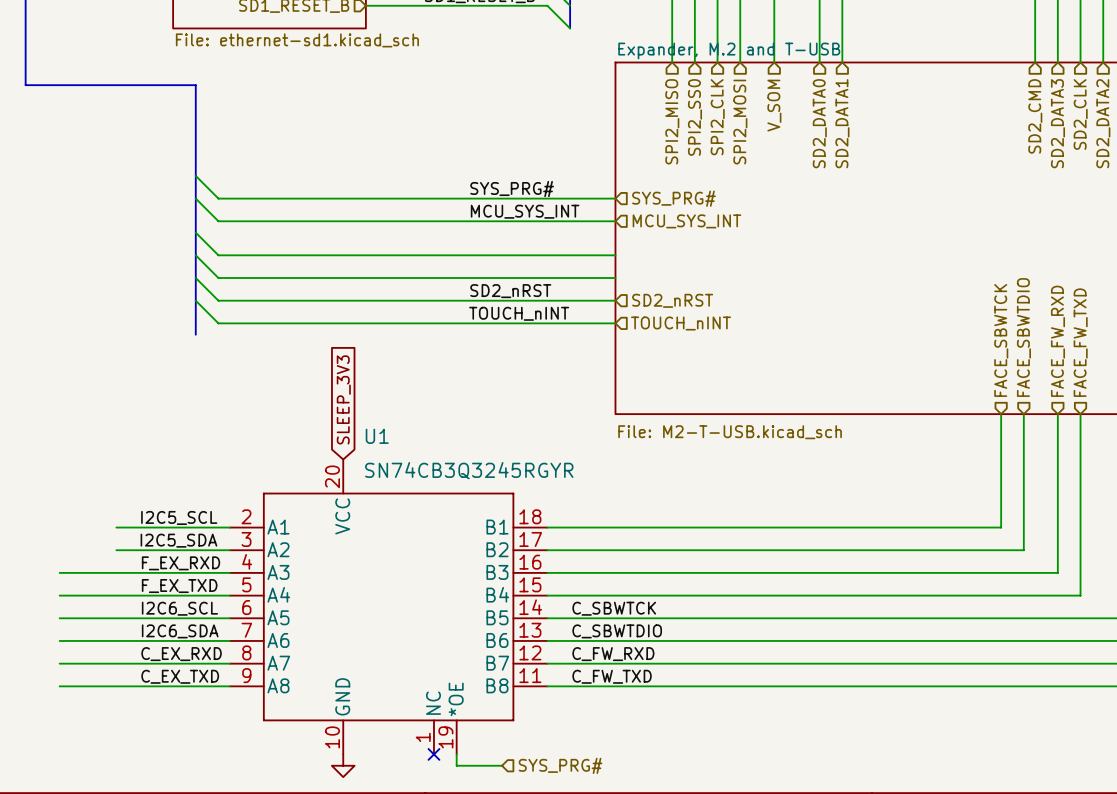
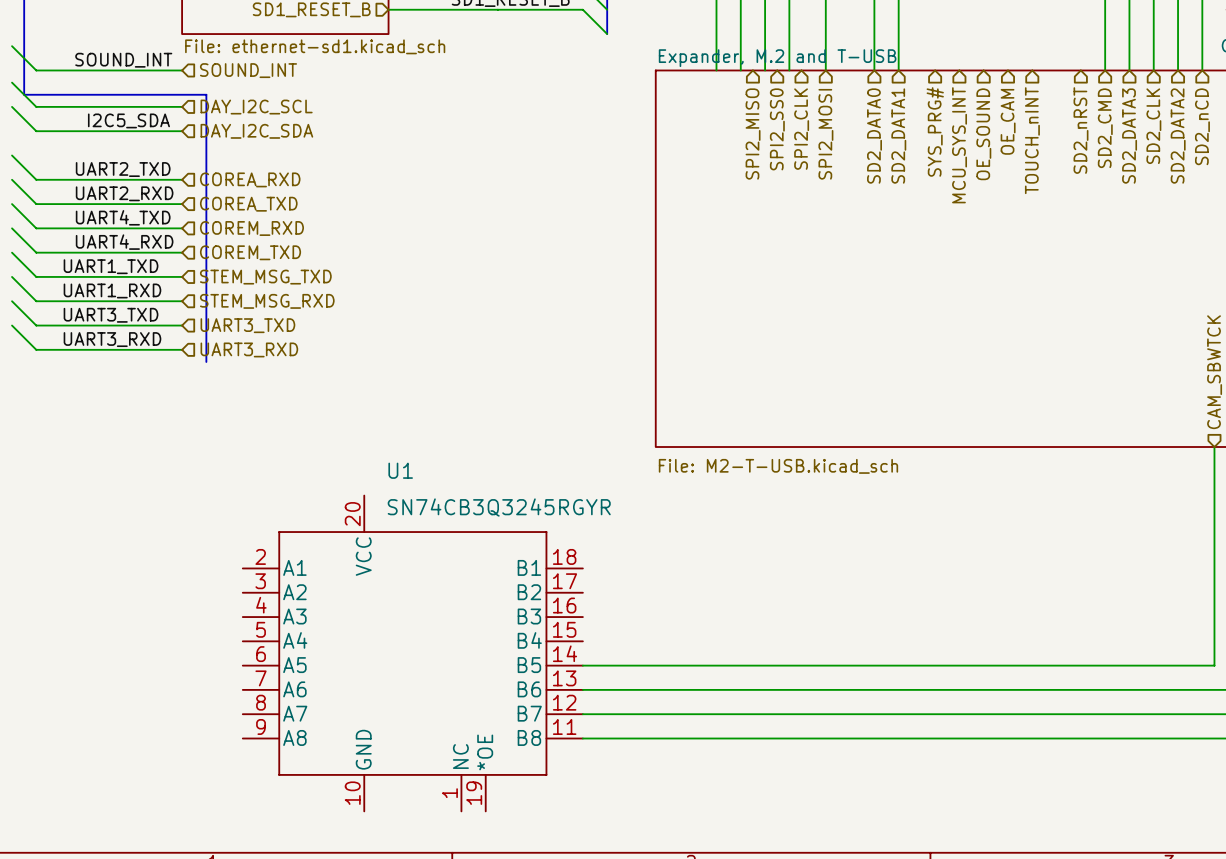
wire: none -> (12, 46) (36, 70) (182, 70)
label: none -> SOUND_INT (123, 60)
hierarchical label: none -> SOUND_INT (248, 70)
wire: none -> (12, 82) (36, 106) (182, 106)
wire: none -> (12, 106) (36, 131) (182, 131)
hierarchical label: none -> DAY_I2C_SCL (256, 107)
hierarchical label: V_SOM (774, 105) -> SPI2_MOSI (825, 134)
label: none -> I2C5_SDA (128, 120)
hierarchical label: none -> OE_CAM (1008, 121)
hierarchical label position: SPI2_SS0 (694, 117) -> SPI2_SS0 (777, 129)
hierarchical label position: SPI2_CLK (717, 117) -> SPI2_CLK (801, 129)
hierarchical label: none -> SD2_nRST (1080, 130)
hierarchical label: none -> DAY_I2C_SDA (256, 131)
hierarchical label: none -> SYS_PRG# (935, 131)
hierarchical label position: SPI2_MISO (672, 121) -> SPI2_MISO (753, 134)
hierarchical label: SPI2_MOSI (740, 122) -> none
hierarchical label: none -> OE_SOUND (983, 134)
hierarchical label: none -> TOUCH_nINT (1032, 140)
hierarchical label: none -> MCU_SYS_INT (959, 145)
wire: none -> (12, 155) (36, 179) (182, 179)
label: none -> UART2_TXD (123, 169)
wire: none -> (12, 179) (36, 204) (182, 204)
hierarchical label: none -> COREA_RXD (250, 179)
wire: (195, 175) (218, 198) (615, 198) -> none
label: none -> UART2_RXD (124, 193)
wire: none -> (12, 204) (36, 228) (182, 228)
hierarchical label: none -> COREA_TXD (248, 204)
label: SYS_PRG# (512, 189) -> none
wire: (195, 198) (218, 221) (615, 221) -> none
hierarchical label: SYS_PRG# (673, 198) -> none
label: none -> UART4_TXD (123, 217)
wire: none -> (12, 228) (36, 252) (182, 252)
hierarchical label: none -> COREM_RXD (251, 228)
label: MCU_SYS_INT (525, 211) -> none
hierarchical label: MCU_SYS_INT (686, 221) -> none
label: none -> UART4_RXD (124, 242)
wire: none -> (12, 252) (36, 276) (182, 276)
wire: (195, 232) (218, 255) (615, 255) -> none
hierarchical label: none -> COREM_TXD (250, 252)
label: none -> UART1_TXD (111, 266)
wire: none -> (12, 276) (36, 301) (182, 301)
wire: (195, 255) (218, 278) (615, 278) -> none
hierarchical label: none -> STEM_MSG_TXD (265, 277)
label: none -> UART1_RXD (112, 290)
wire: none -> (12, 301) (36, 325) (182, 325)
wire: (195, 278) (218, 300) (615, 300) -> none
hierarchical label: none -> STEM_MSG_RXD (267, 301)
label: none -> UART3_TXD (111, 315)
label: SD2_nRST (510, 291) -> none
wire: none -> (12, 325) (36, 349) (182, 349)
wire: (195, 300) (218, 323) (615, 323) -> none
hierarchical label: none -> UART3_TXD (247, 325)
hierarchical label: SD2_nRST (672, 300) -> none
label: none -> UART3_RXD (112, 339)
label: TOUCH_nINT (519, 313) -> none
hierarchical label: none -> UART3_RXD (249, 349)
hierarchical label: TOUCH_nINT (681, 323) -> none
hierarchical label: FACE_SBWTDIO (1023, 337) -> none
hierarchical label: FACE_SBWTCK (1001, 340) -> none
hierarchical label: FACE_FW_RXD (1057, 341) -> none
hierarchical label: FACE_FW_TXD (1080, 342) -> none
global label: SLEEP_3V3 (343, 399) -> none
wire: (1001, 414) (1001, 527) (547, 527) -> none
wire: (1023, 414) (1023, 550) (547, 550) -> none
wire: (1057, 414) (1057, 572) (547, 572) -> none
wire: (1080, 414) (1080, 595) (547, 595) -> none
label: I2C5_SCL (179, 517) -> none
wire: (116, 527) (229, 527) -> none
label: I2C5_SDA (178, 540) -> none
wire: (116, 550) (229, 550) -> none
label: F_EX_RXD (181, 563) -> none
wire: (59, 572) (229, 572) -> none
label: F_EX_TXD (179, 586) -> none
wire: (59, 595) (229, 595) -> none
label: I2C6_SCL (179, 608) -> none
label: C_SBWTCK (614, 608) -> none
wire: (59, 618) (229, 618) -> none
label: I2C6_SDA (180, 631) -> none
label: C_SBWTDIO (617, 631) -> none
wire: (59, 640) (229, 640) -> none
label: C_EX_RXD (181, 654) -> none
label: C_FW_RXD (613, 654) -> none
wire: (59, 663) (229, 663) -> none
label: C_EX_TXD (180, 676) -> none
label: C_FW_TXD (612, 676) -> none
wire: (59, 686) (229, 686) -> none
no-connect mark: (433, 754) -> none
wire: (456, 754) (456, 765) (502, 765) -> none
power symbol: (343, 765) -> none
hierarchical label: SYS_PRG# (560, 765) -> none

